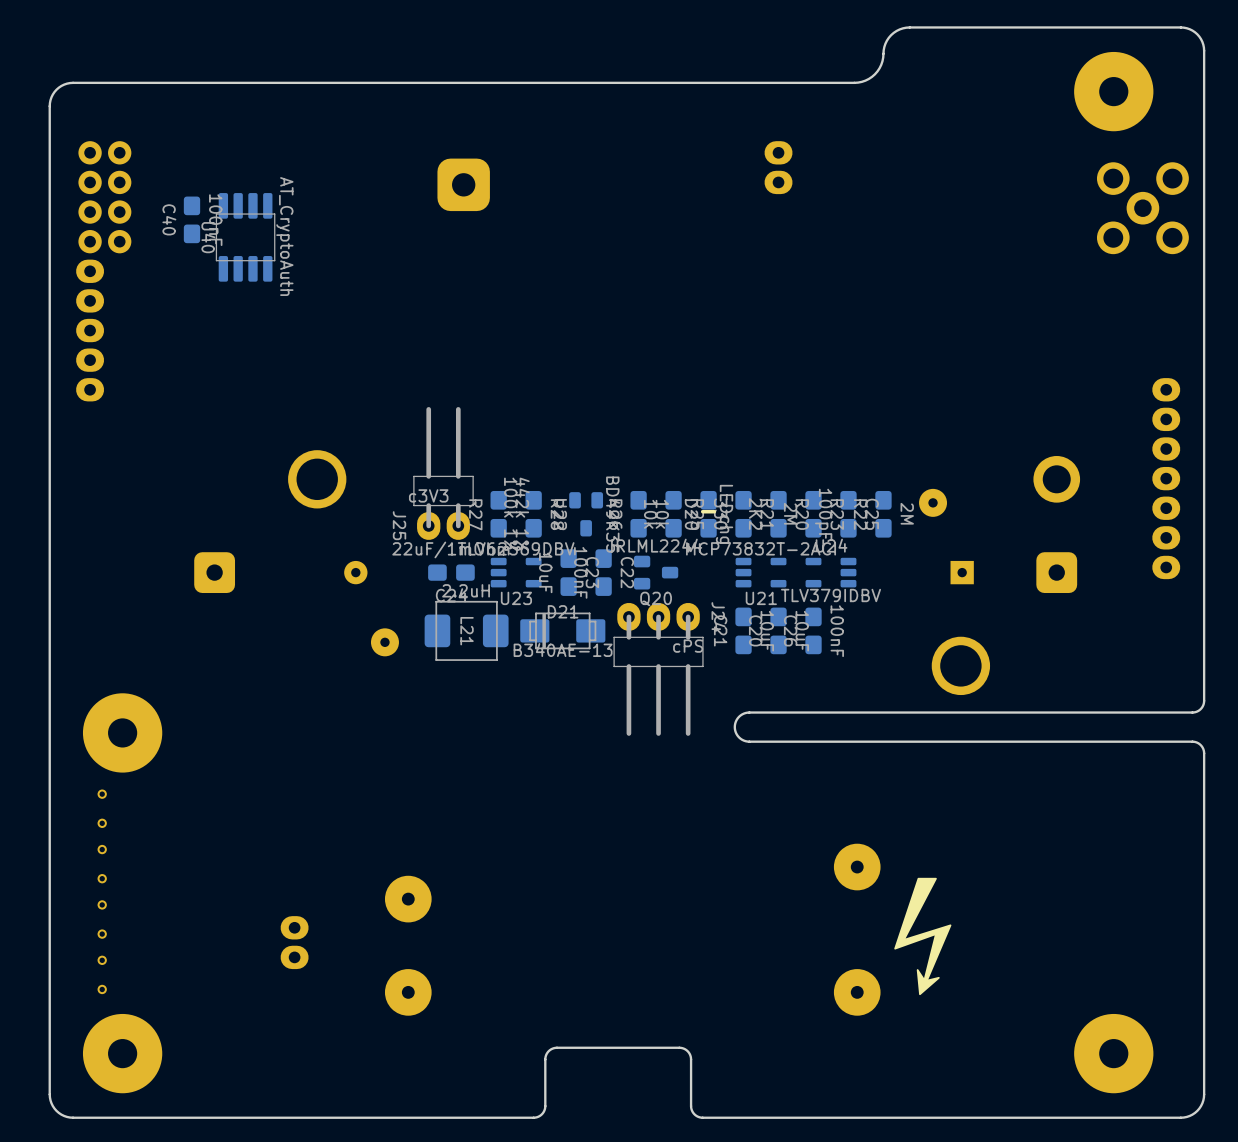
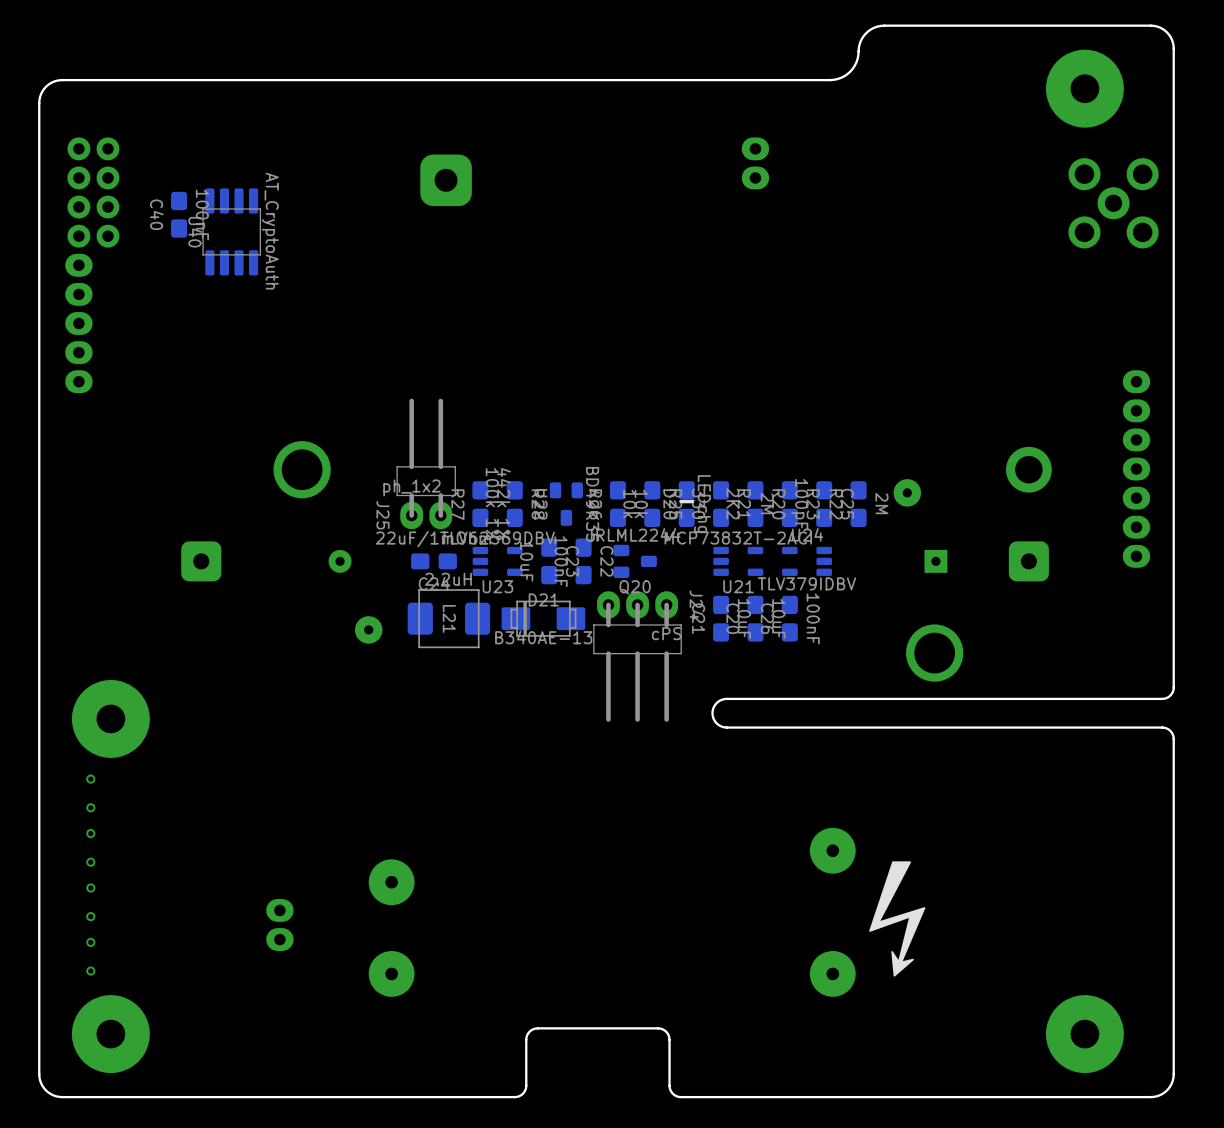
J25 value: c3V3 (428, 495) -> ph_1x2 (411, 487)

